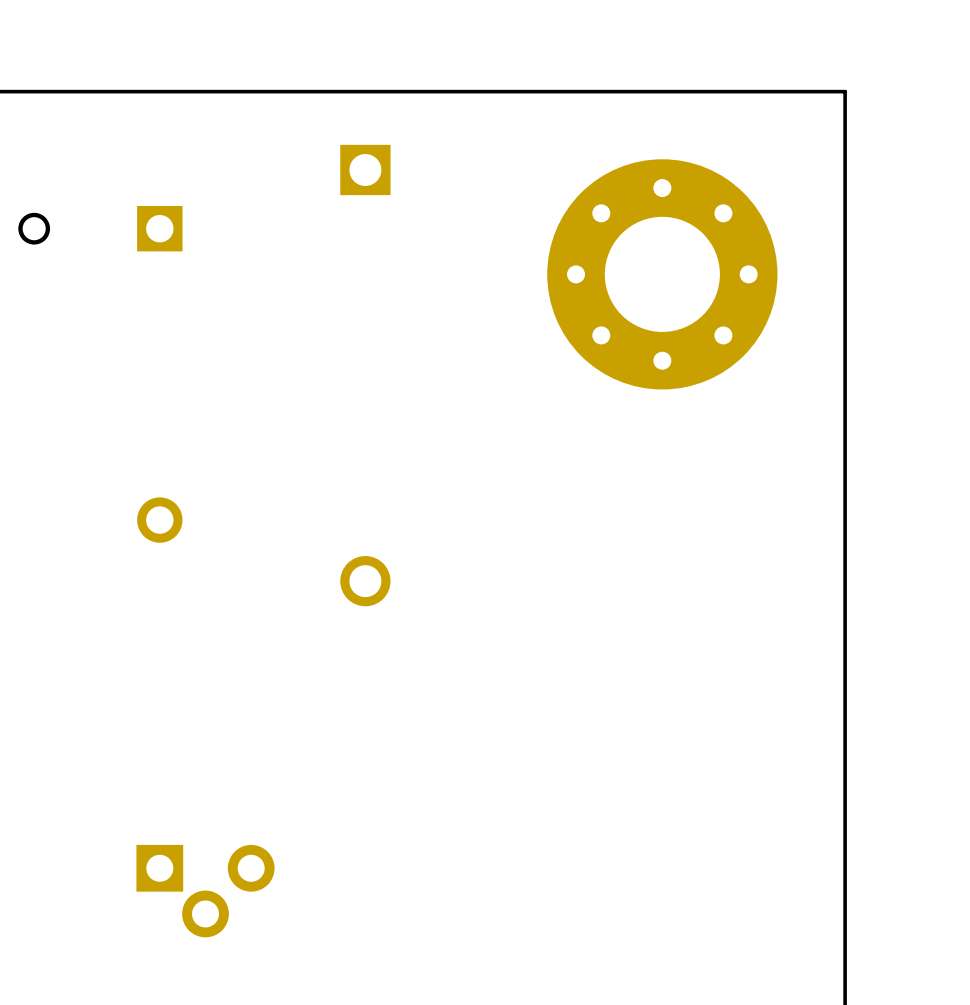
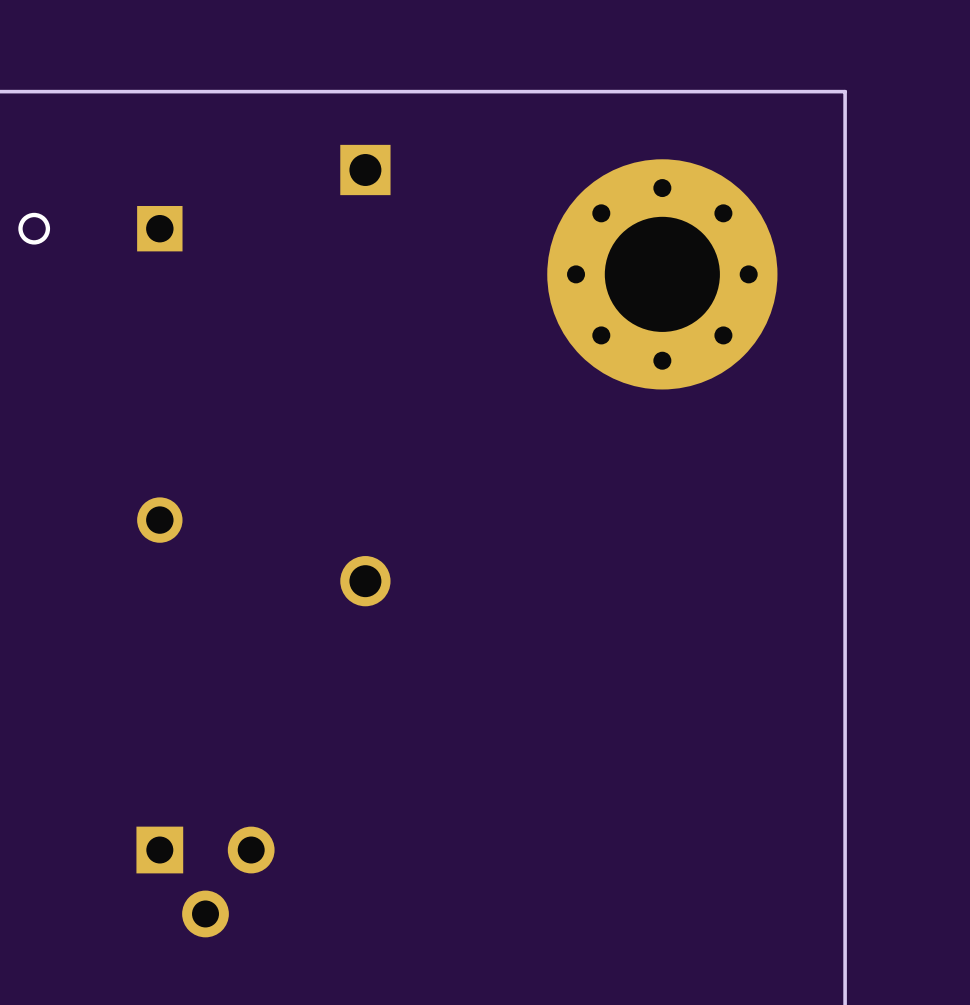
part footprint: [136, 844, 275, 938] -> [136, 826, 275, 938]

